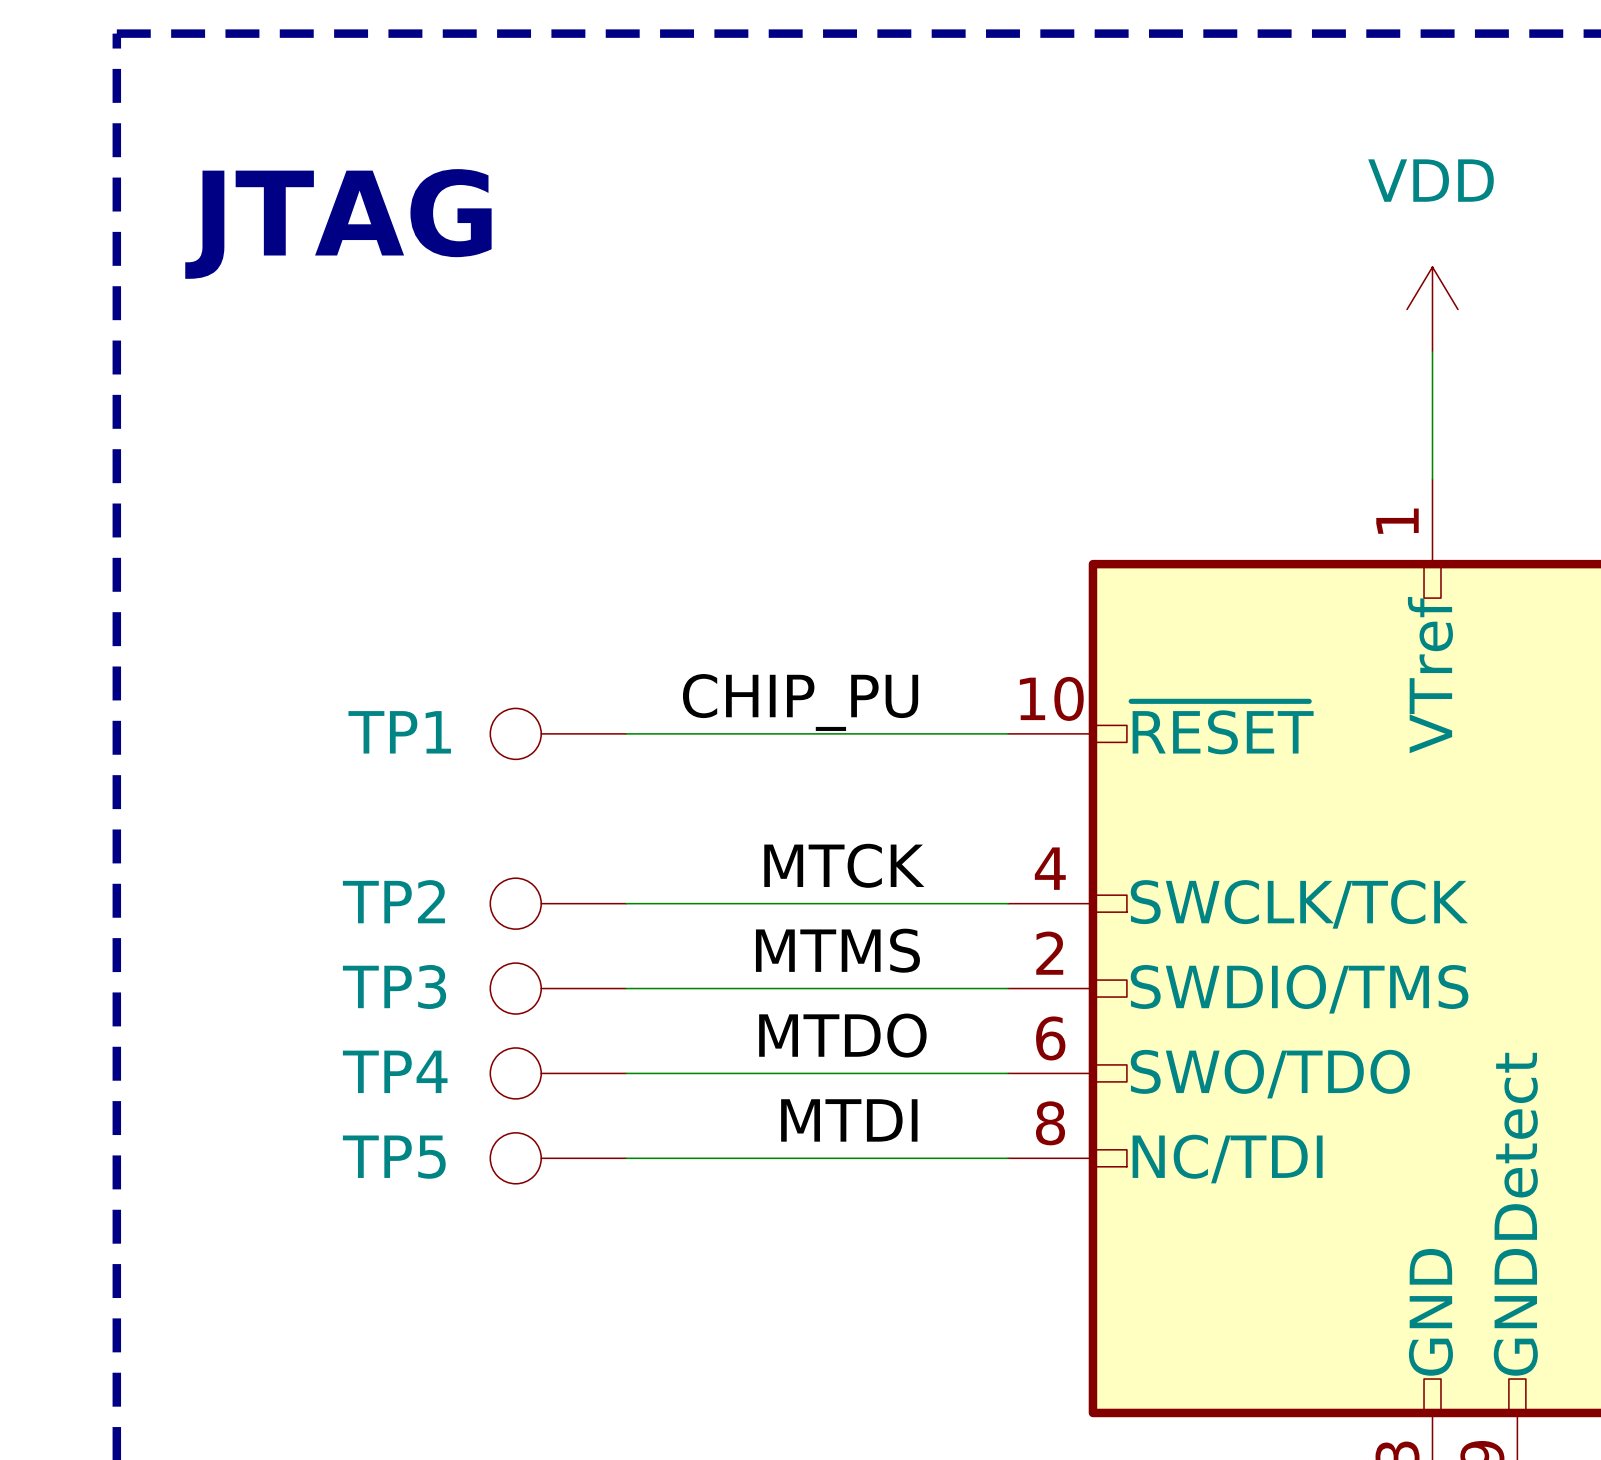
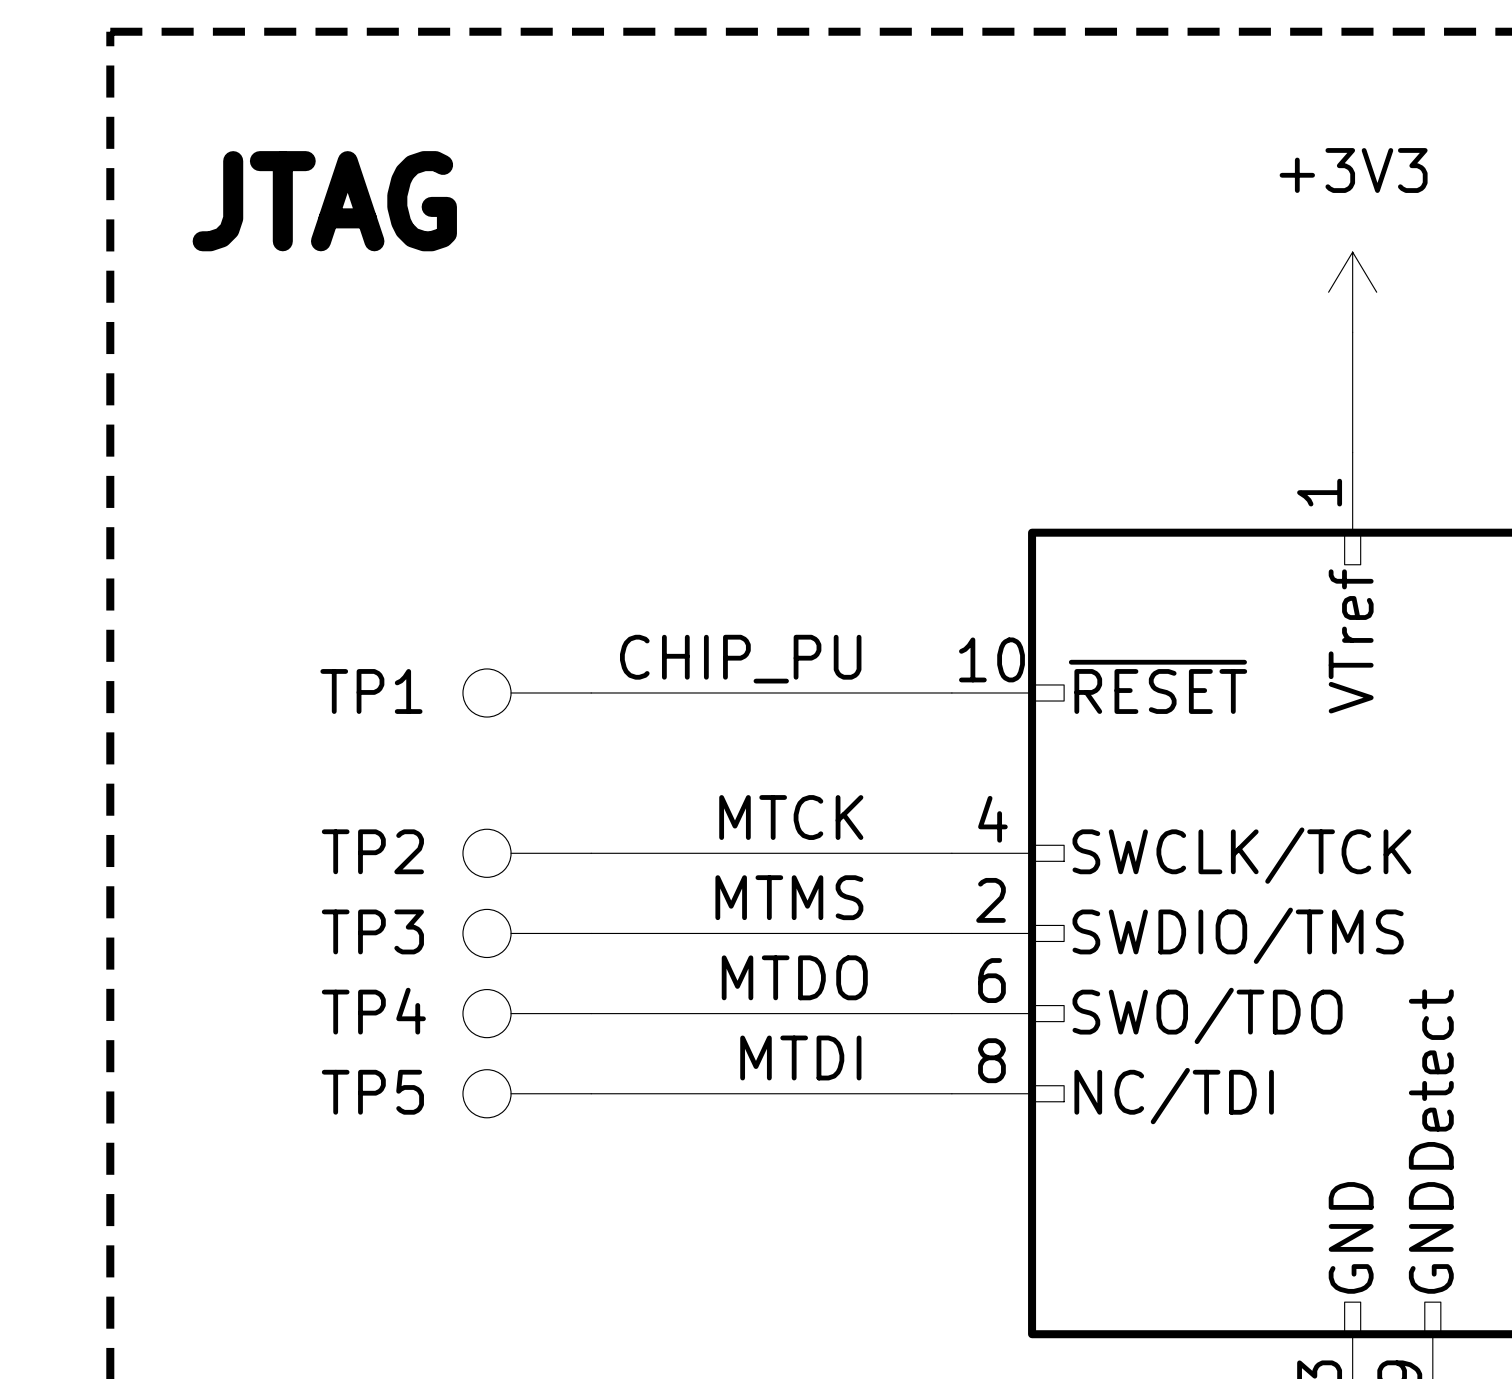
power symbol: VDD (1432, 309) -> +3V3 (1352, 292)

